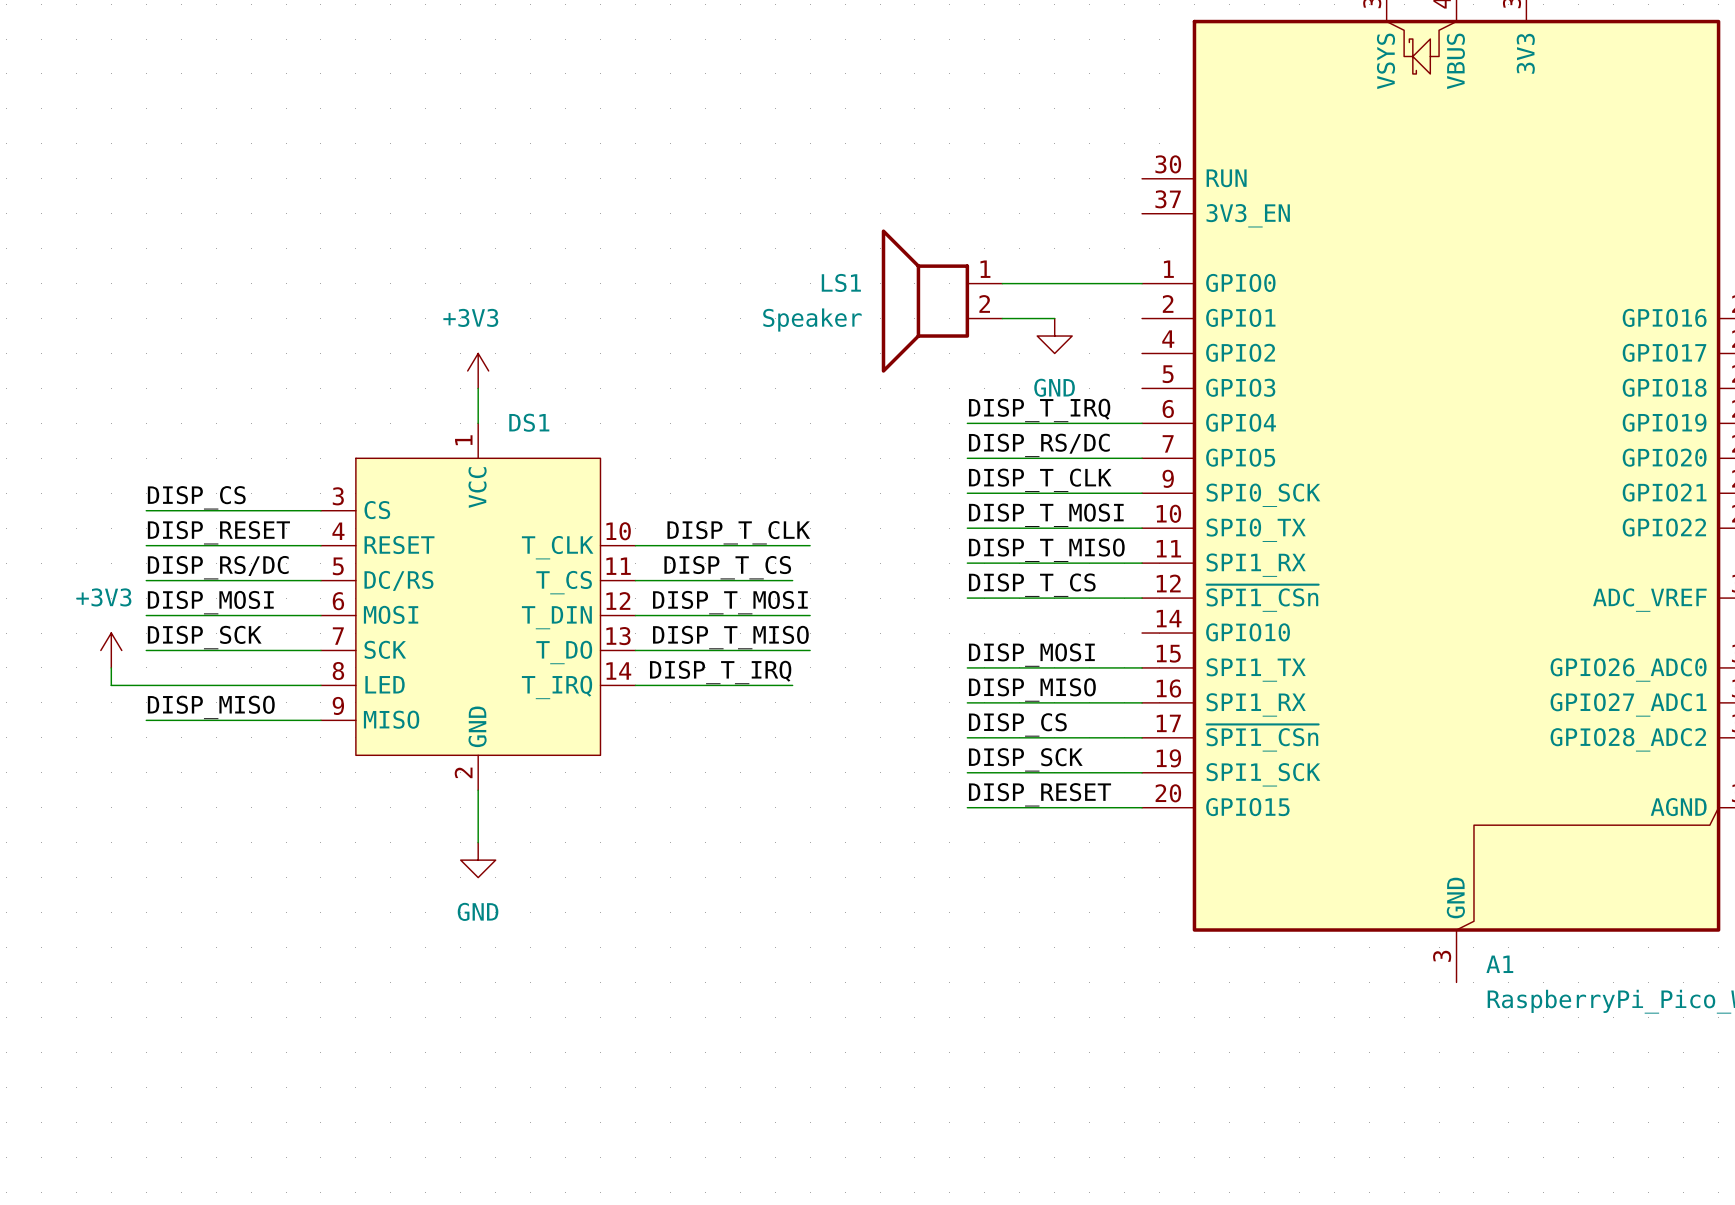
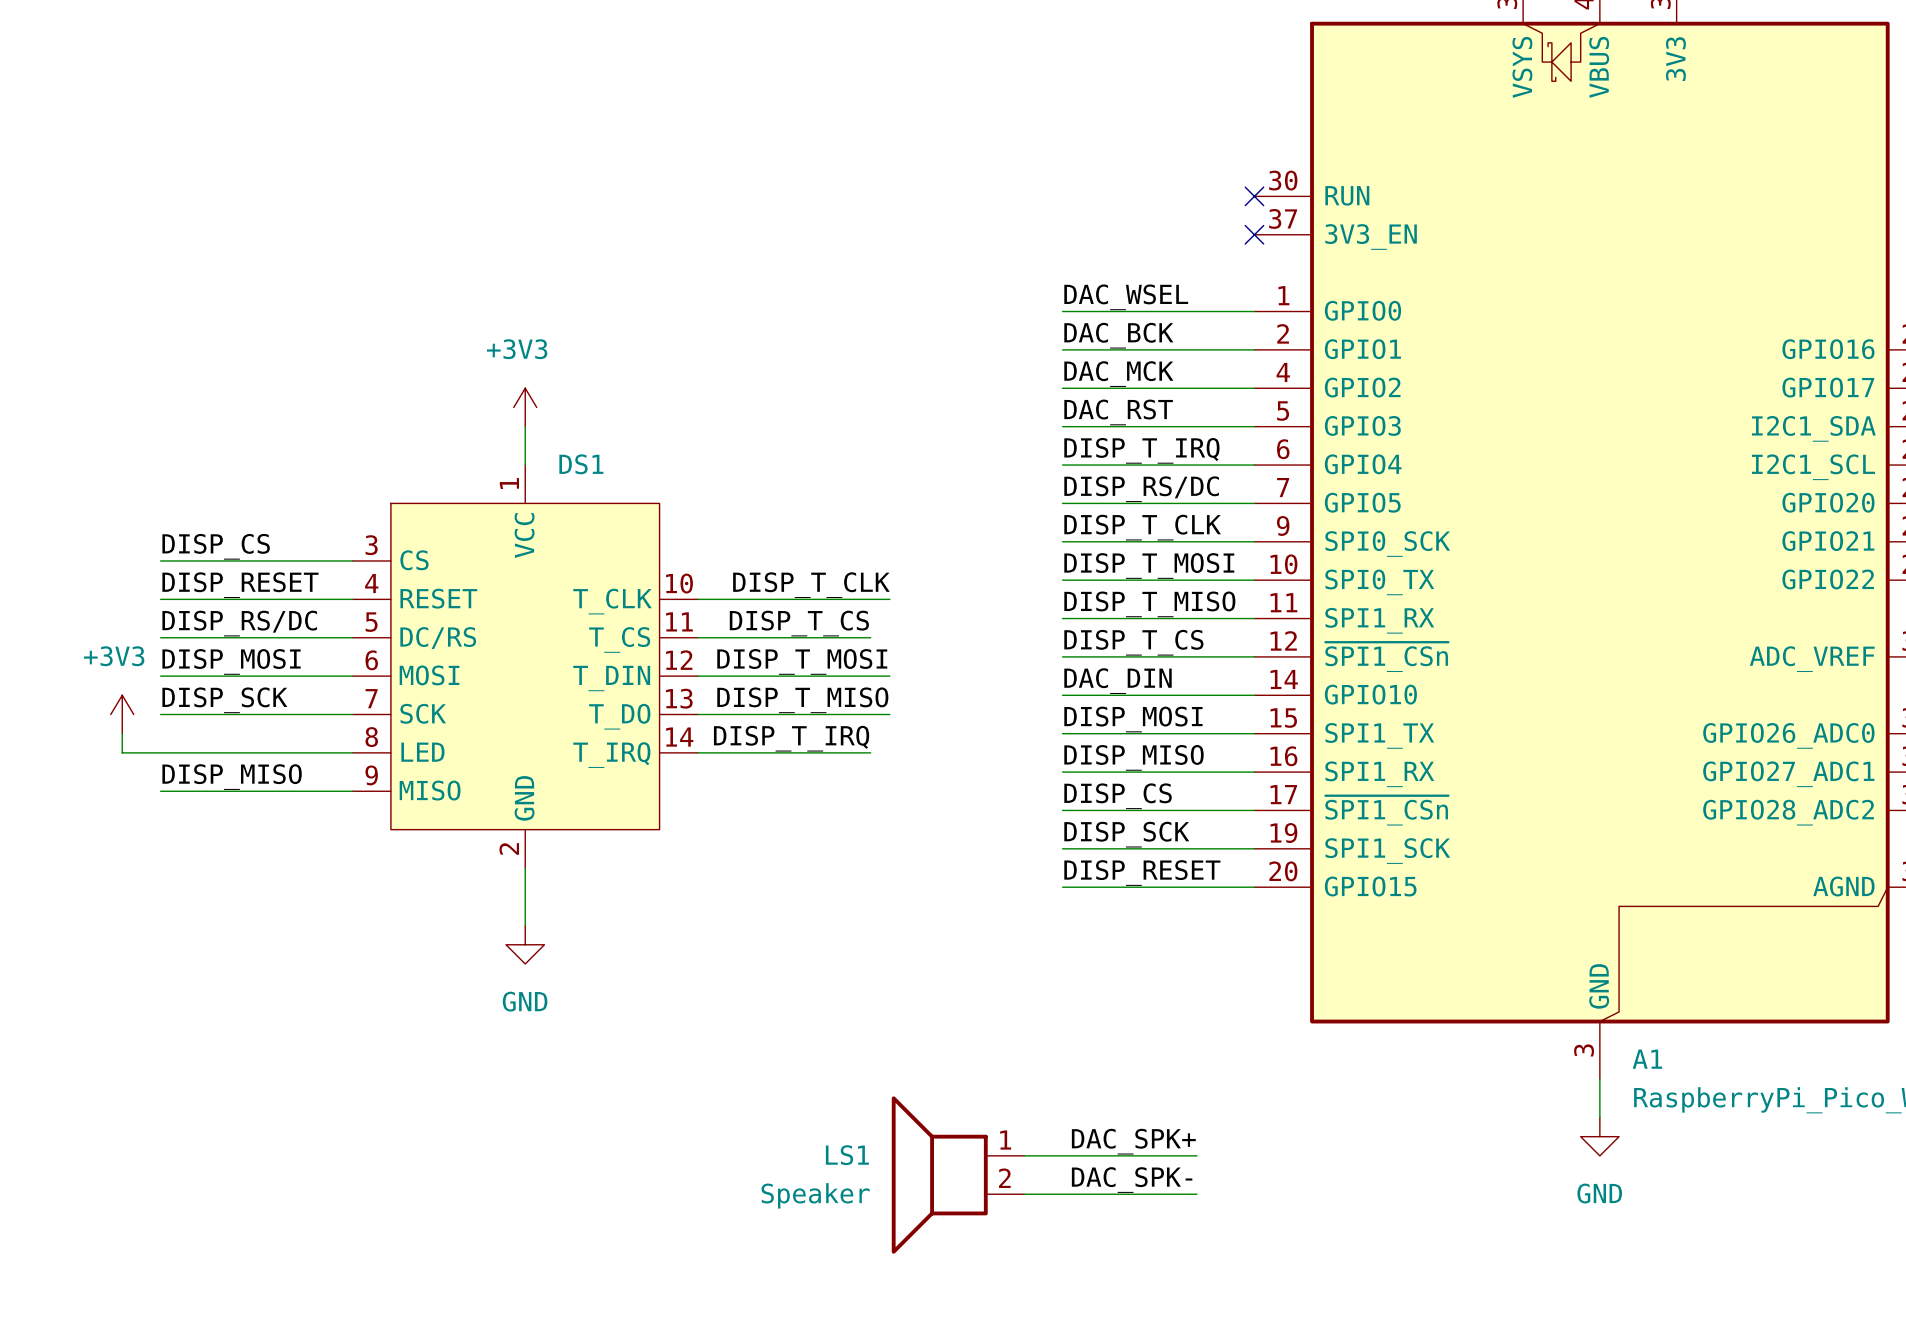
no-connect mark: none -> (1254, 196)
no-connect mark: none -> (1254, 234)
label: none -> DAC_WSEL (1126, 297)
LS1 position: (942, 301) -> (957, 1175)
label: none -> DAC_BCK (1118, 335)
wire: none -> (1158, 349) (1254, 349)
power symbol: GND (1054, 336) -> none
label: none -> DAC_MCK (1118, 374)
wire: none -> (1062, 388) (1254, 388)
label: none -> DAC_RST (1118, 412)
A1 pin name: GPIO18 (1664, 387) -> I2C1_SDA (1813, 428)
wire: none -> (1062, 426) (1254, 426)
A1 pin name: GPIO19 (1664, 422) -> I2C1_SCL (1813, 467)
label: none -> DAC_DIN (1118, 681)
wire: none -> (1062, 695) (1254, 695)
wire: none -> (1599, 1079) (1599, 1117)
power symbol: none -> GND (1599, 1136)
label: none -> DAC_SPK+ (1133, 1141)
wire: none -> (1024, 1155) (1196, 1155)
label: none -> DAC_SPK- (1132, 1180)
wire: none -> (1024, 1194) (1196, 1194)

